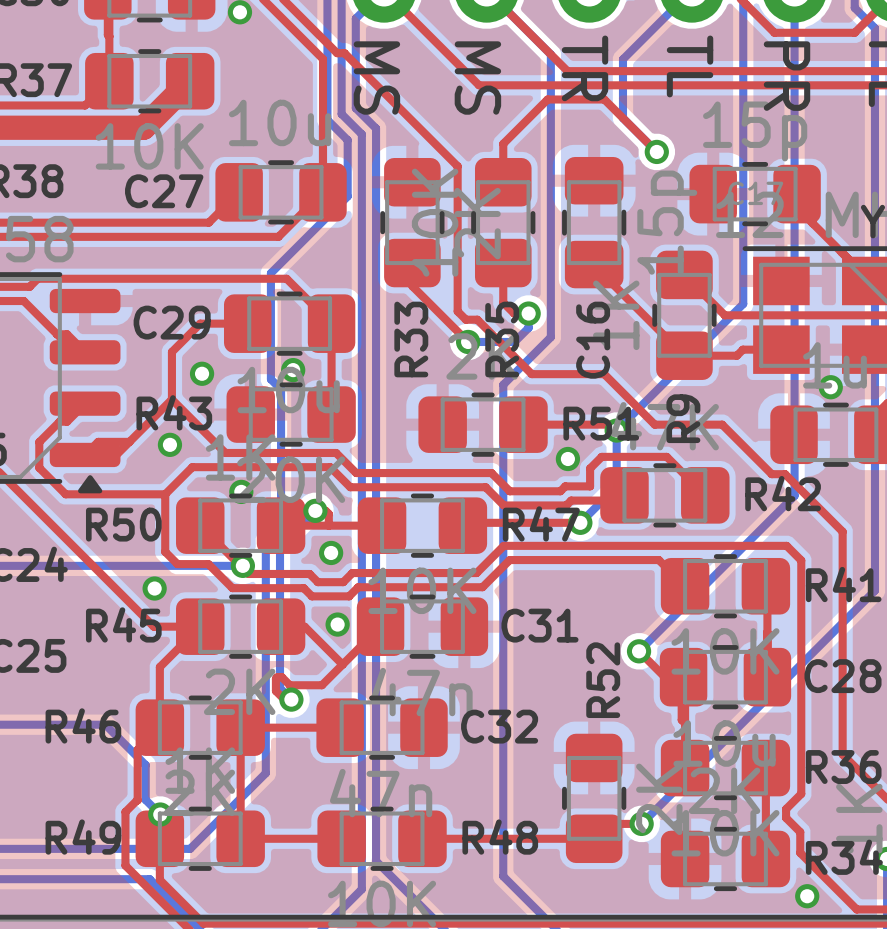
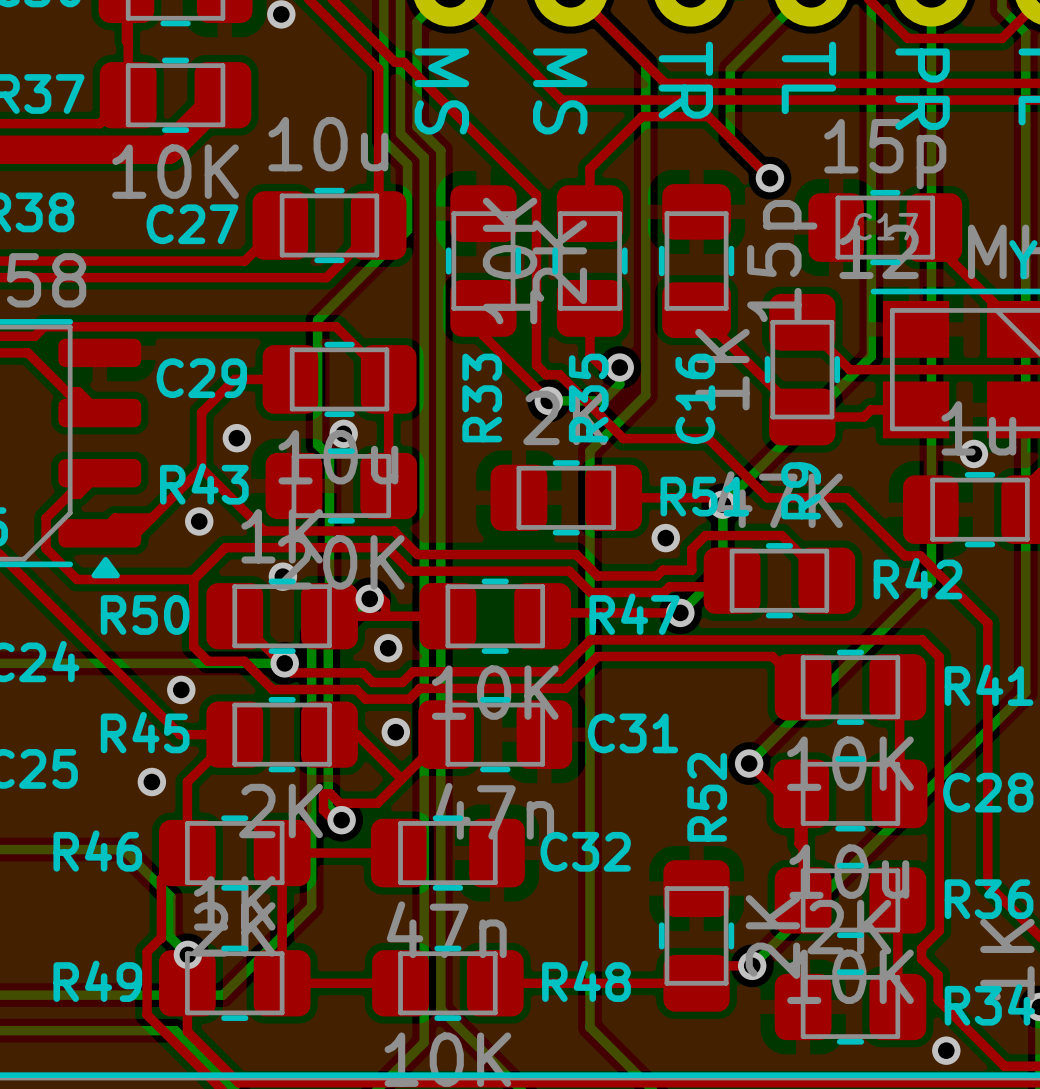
via: none -> (151, 782)

